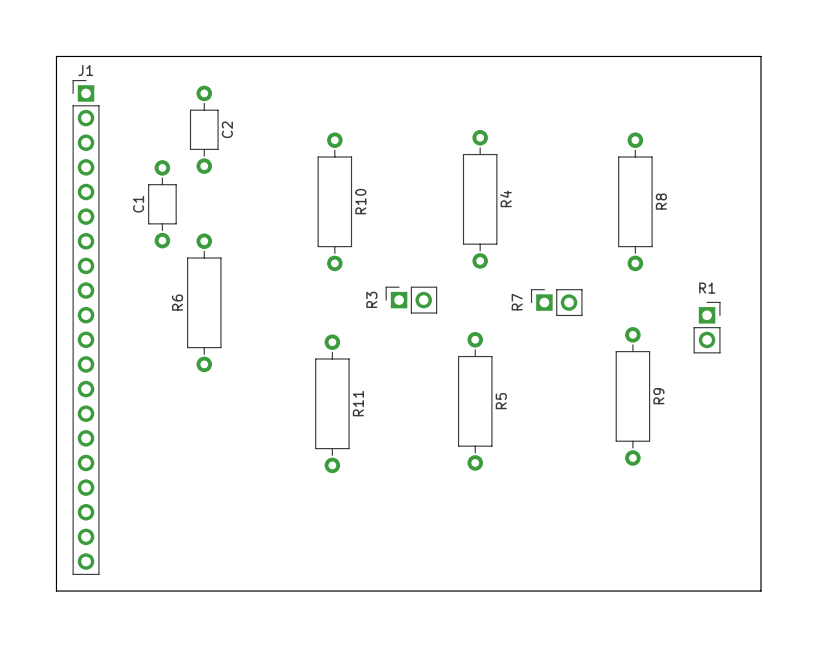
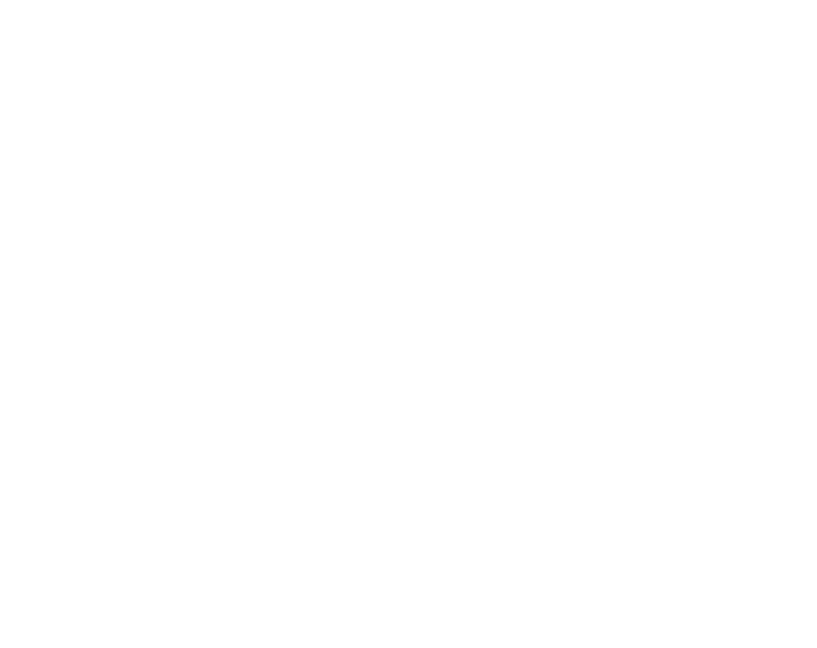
board edge: (56, 56) (761, 56) (761, 591) (56, 591) (56, 56) -> none
C2: (204, 129) -> none
R4: (480, 199) -> none
R10: (334, 201) -> none
R8: (635, 201) -> none
C1: (162, 204) -> none
R3: (411, 300) -> none
R6: (204, 302) -> none
R7: (556, 302) -> none
J1: (86, 327) -> none
R1: (707, 327) -> none
R9: (632, 396) -> none
R5: (475, 401) -> none
R11: (332, 403) -> none

